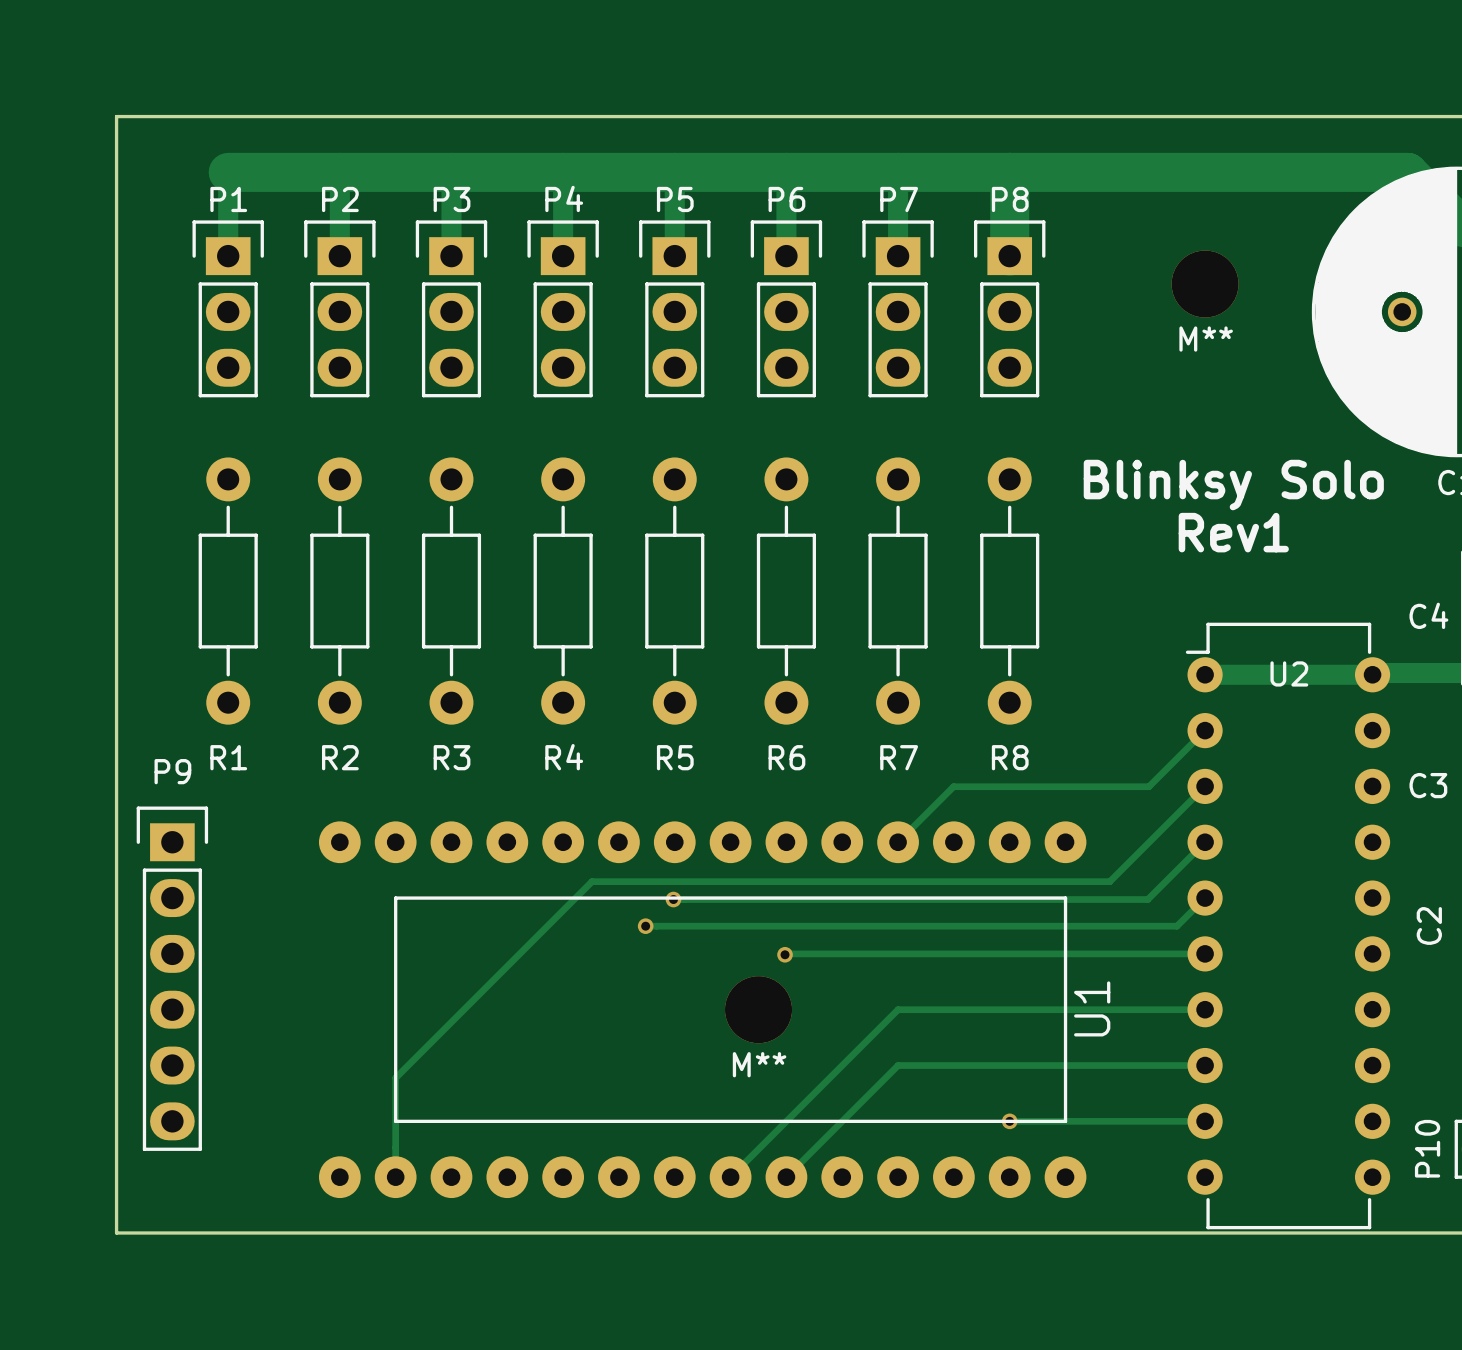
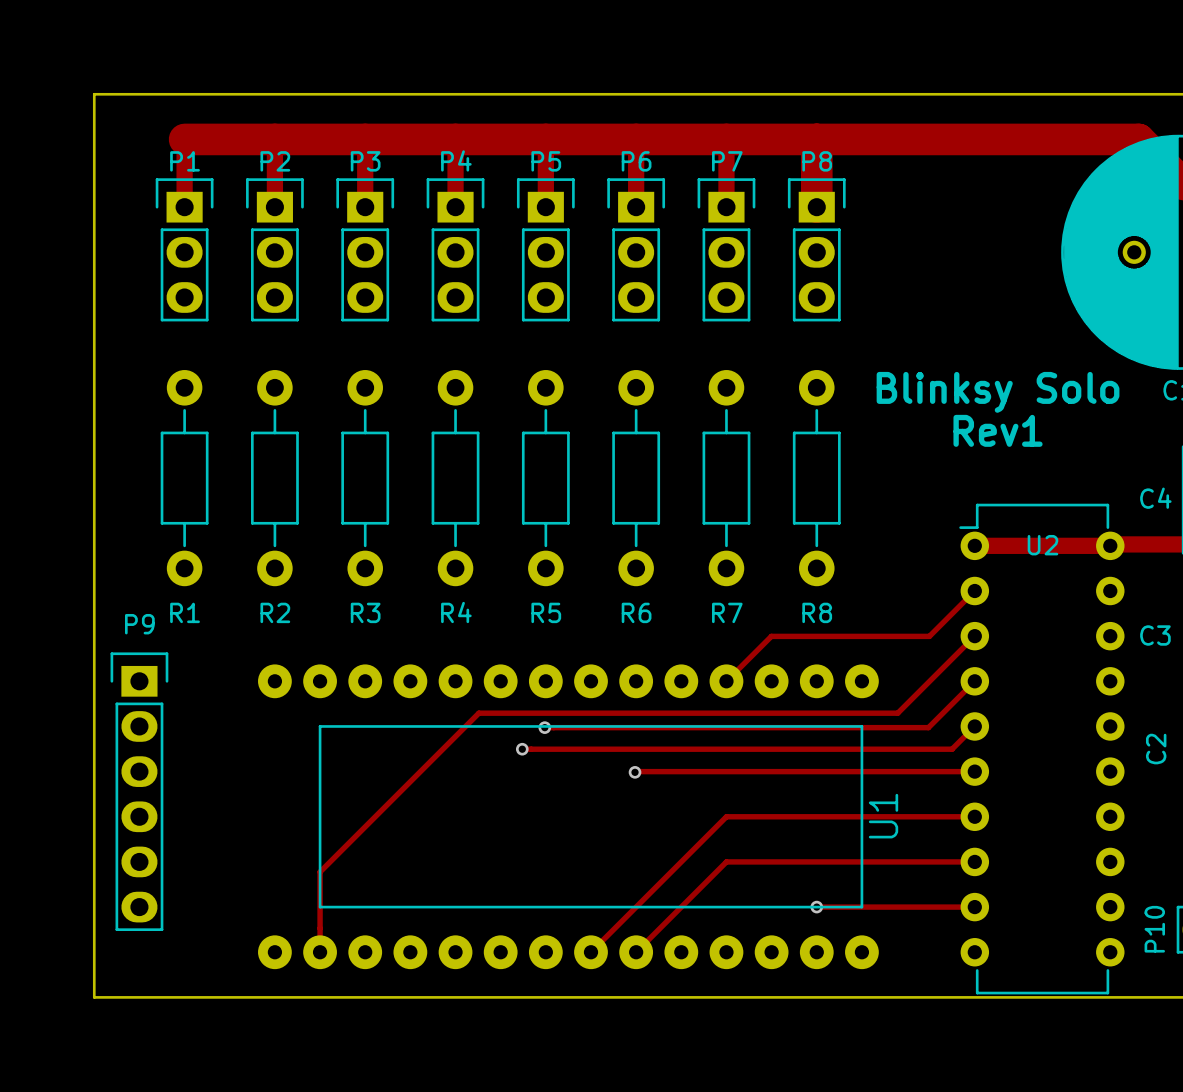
M**: (1205, 284) -> none
M**: (758, 1009) -> none

